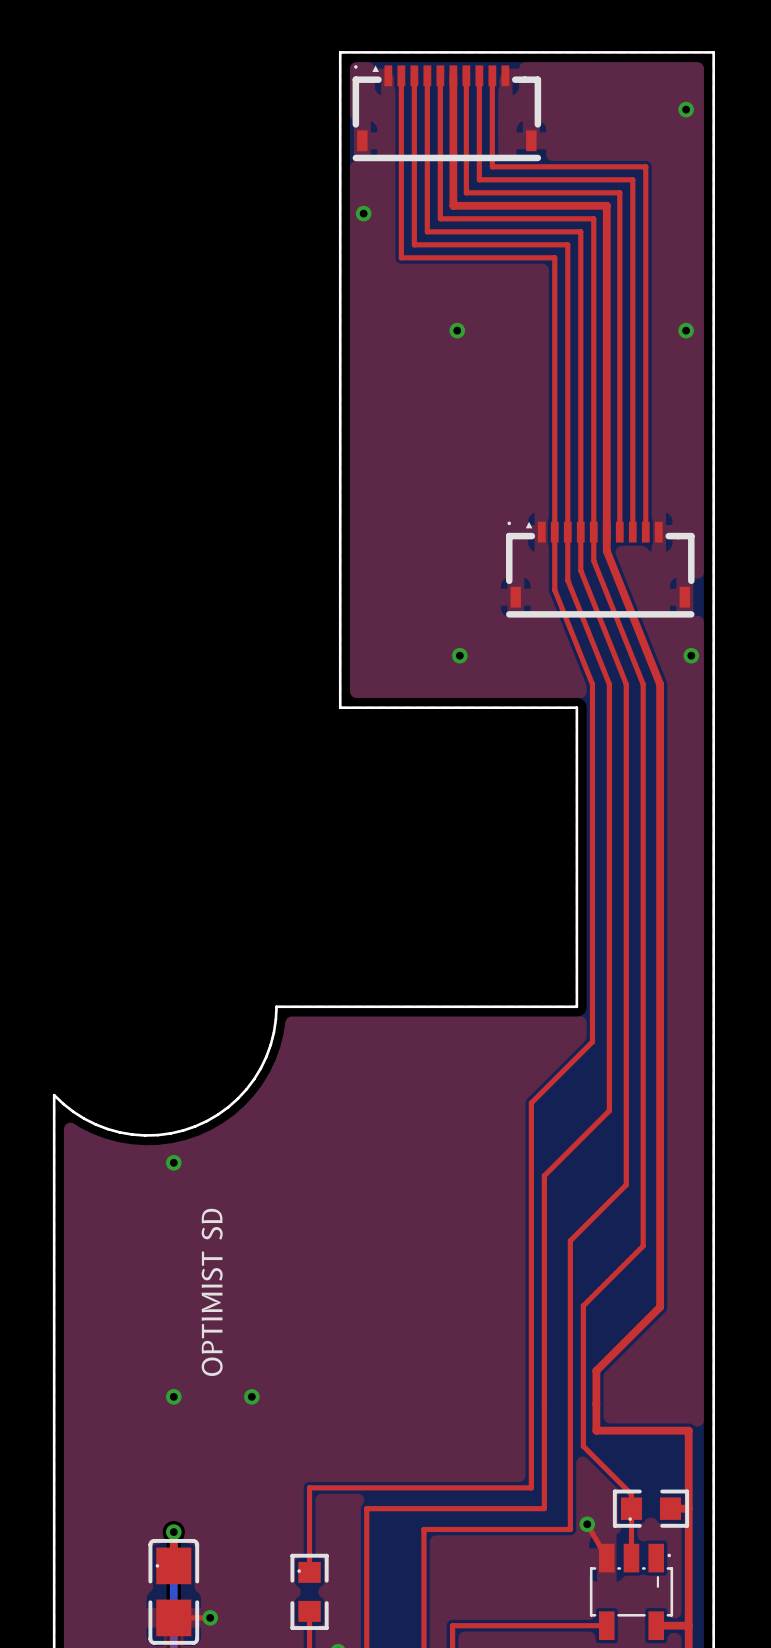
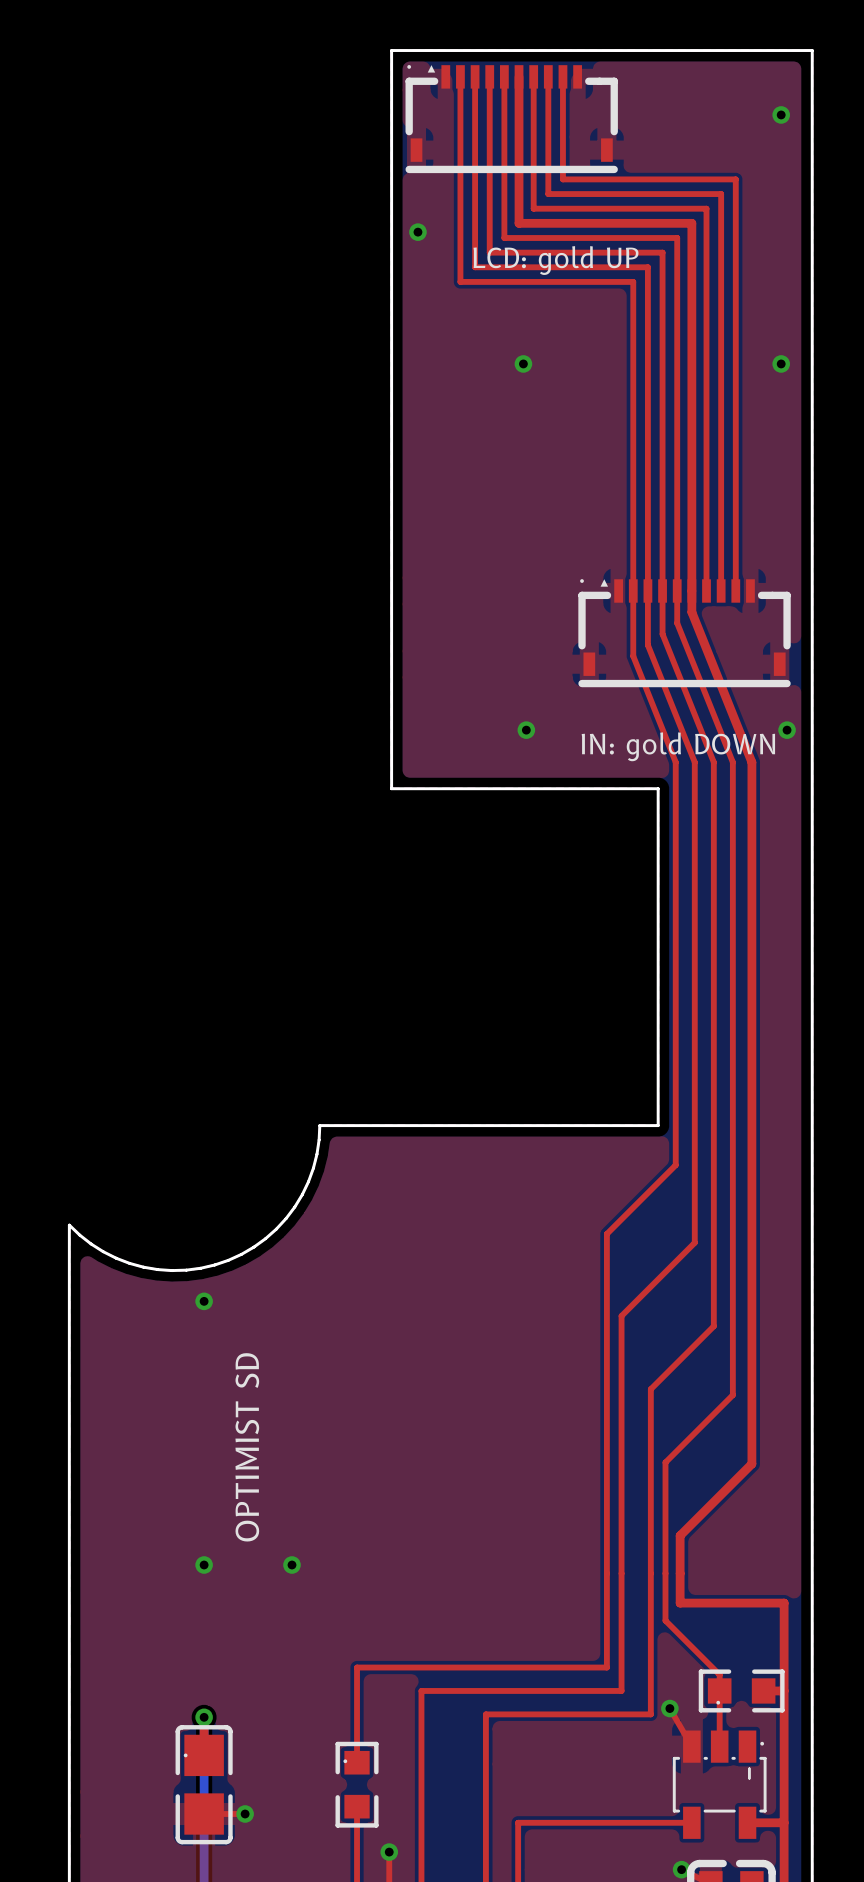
text: none -> LCD: gold UP (555, 260)
text: none -> IN: gold DOWN (678, 746)

